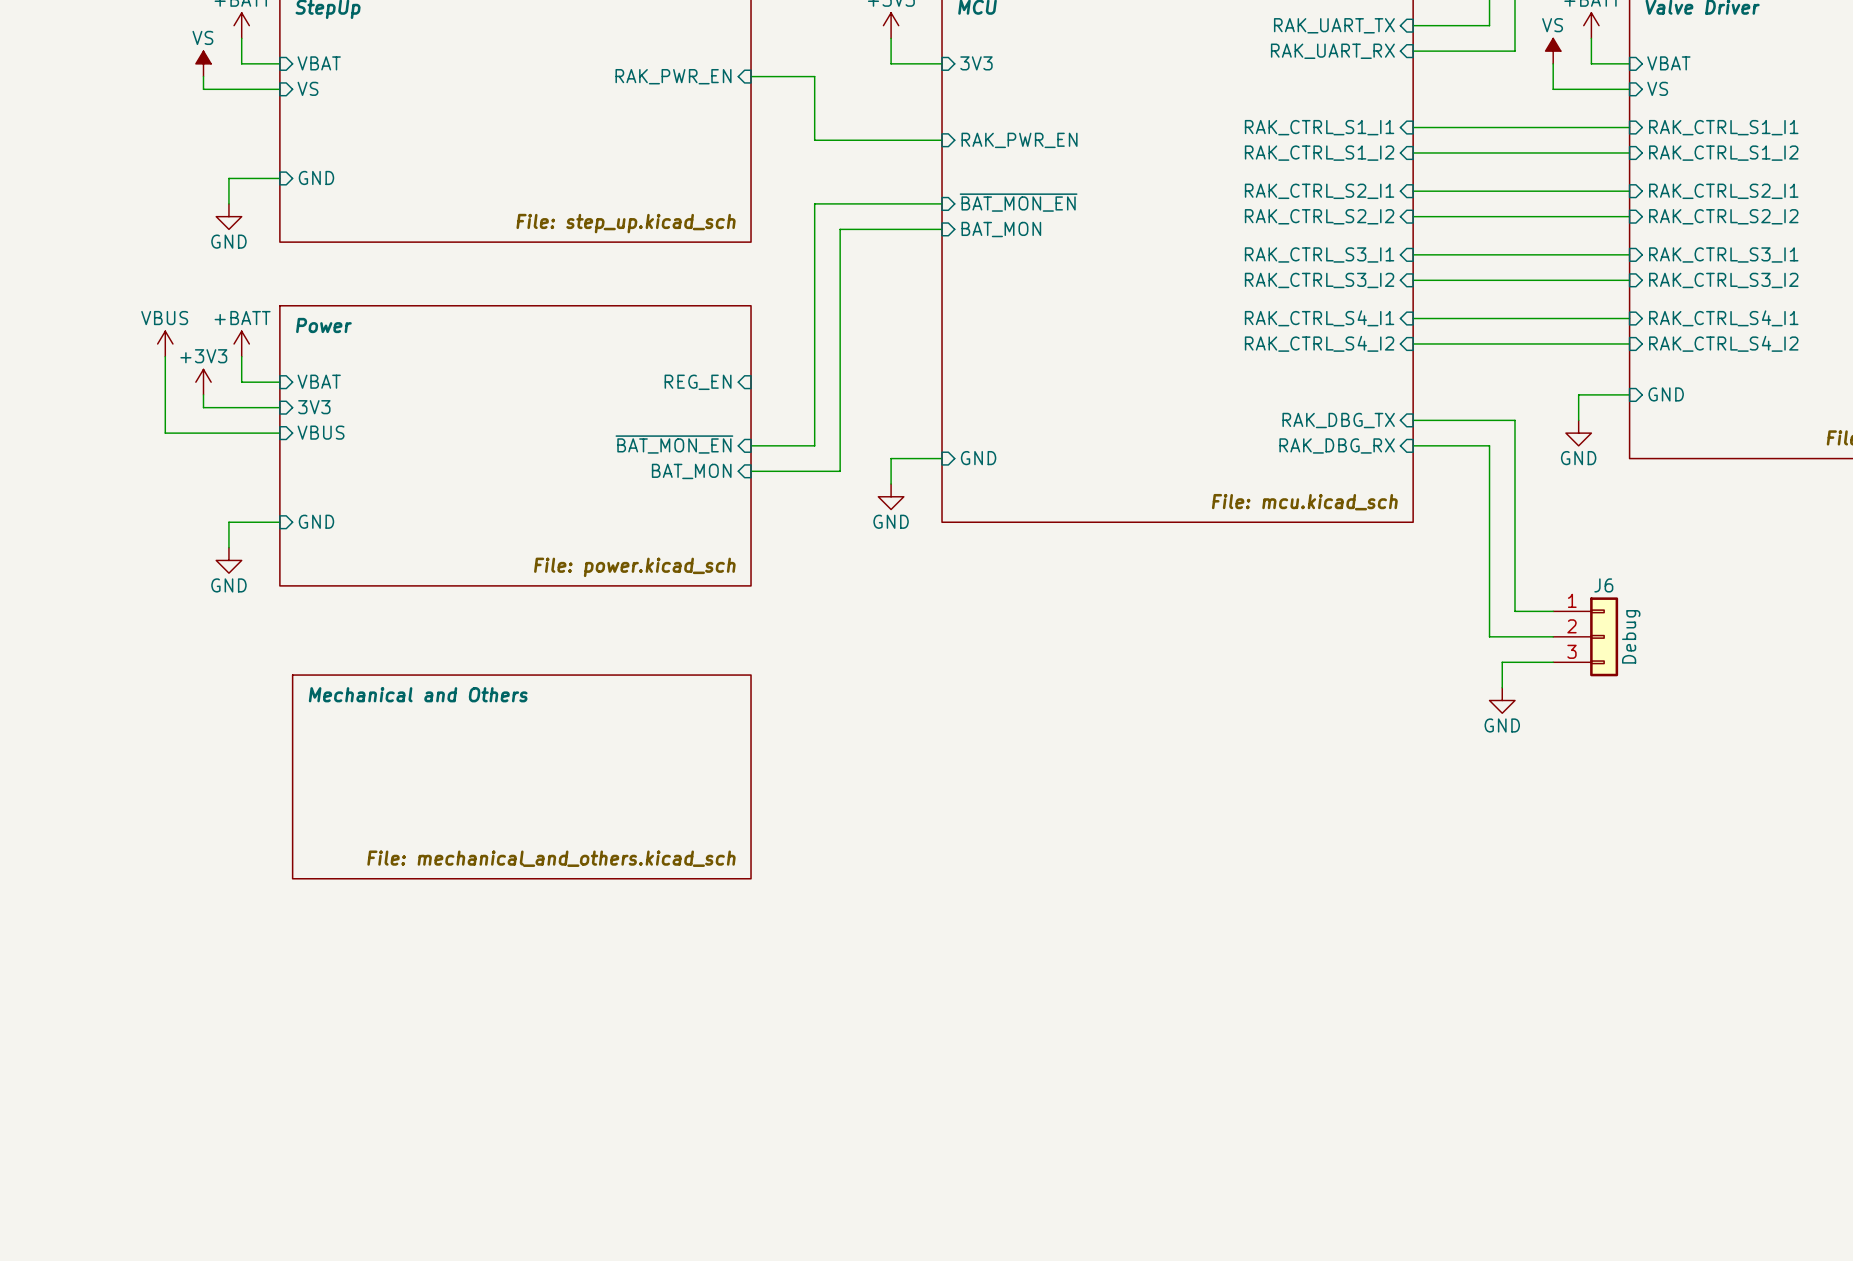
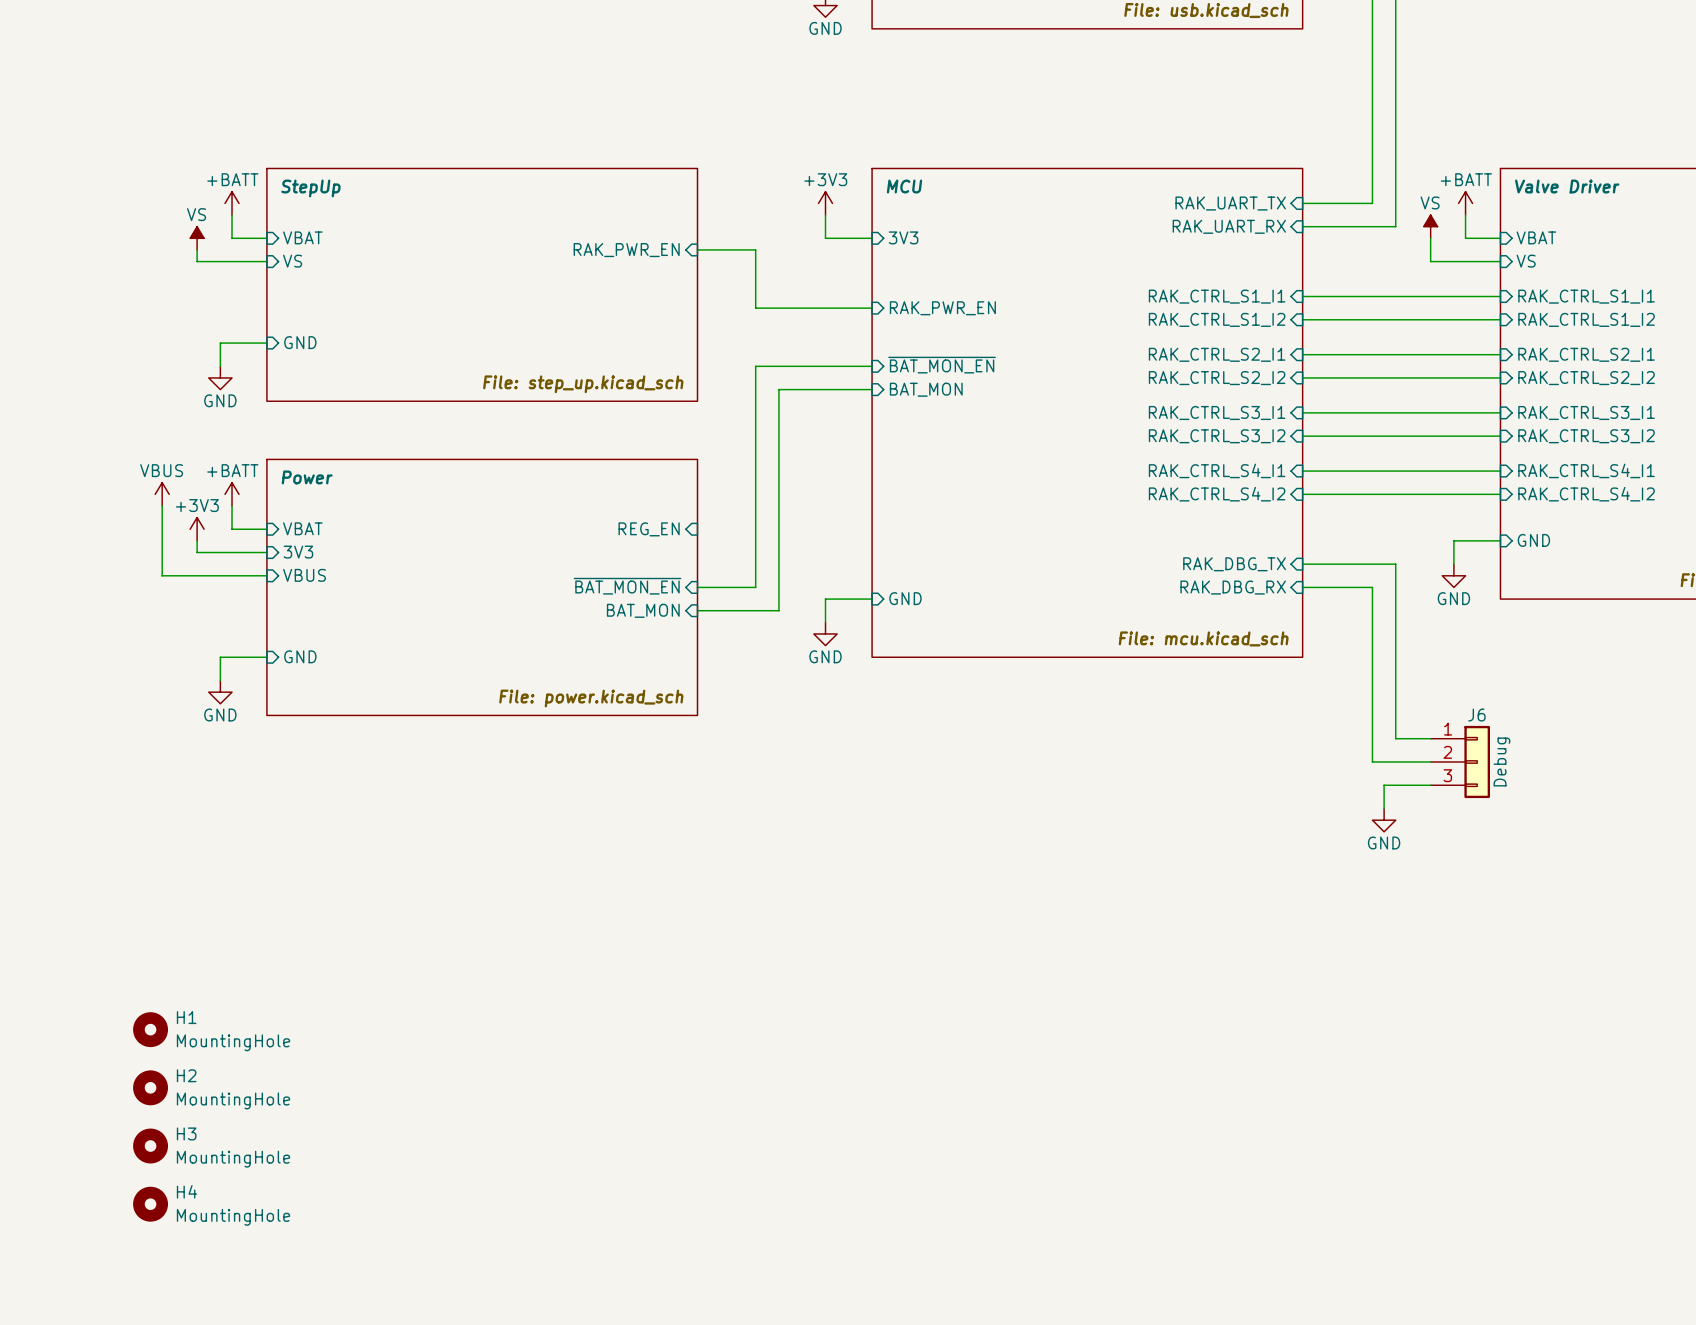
sheet Mechanical and Others: File: mechanical_and_others.kicad_sch (521, 776) -> none
H1: none -> MountingHole (150, 1029)
H2: none -> MountingHole (150, 1087)
H3: none -> MountingHole (150, 1146)
H4: none -> MountingHole (150, 1204)

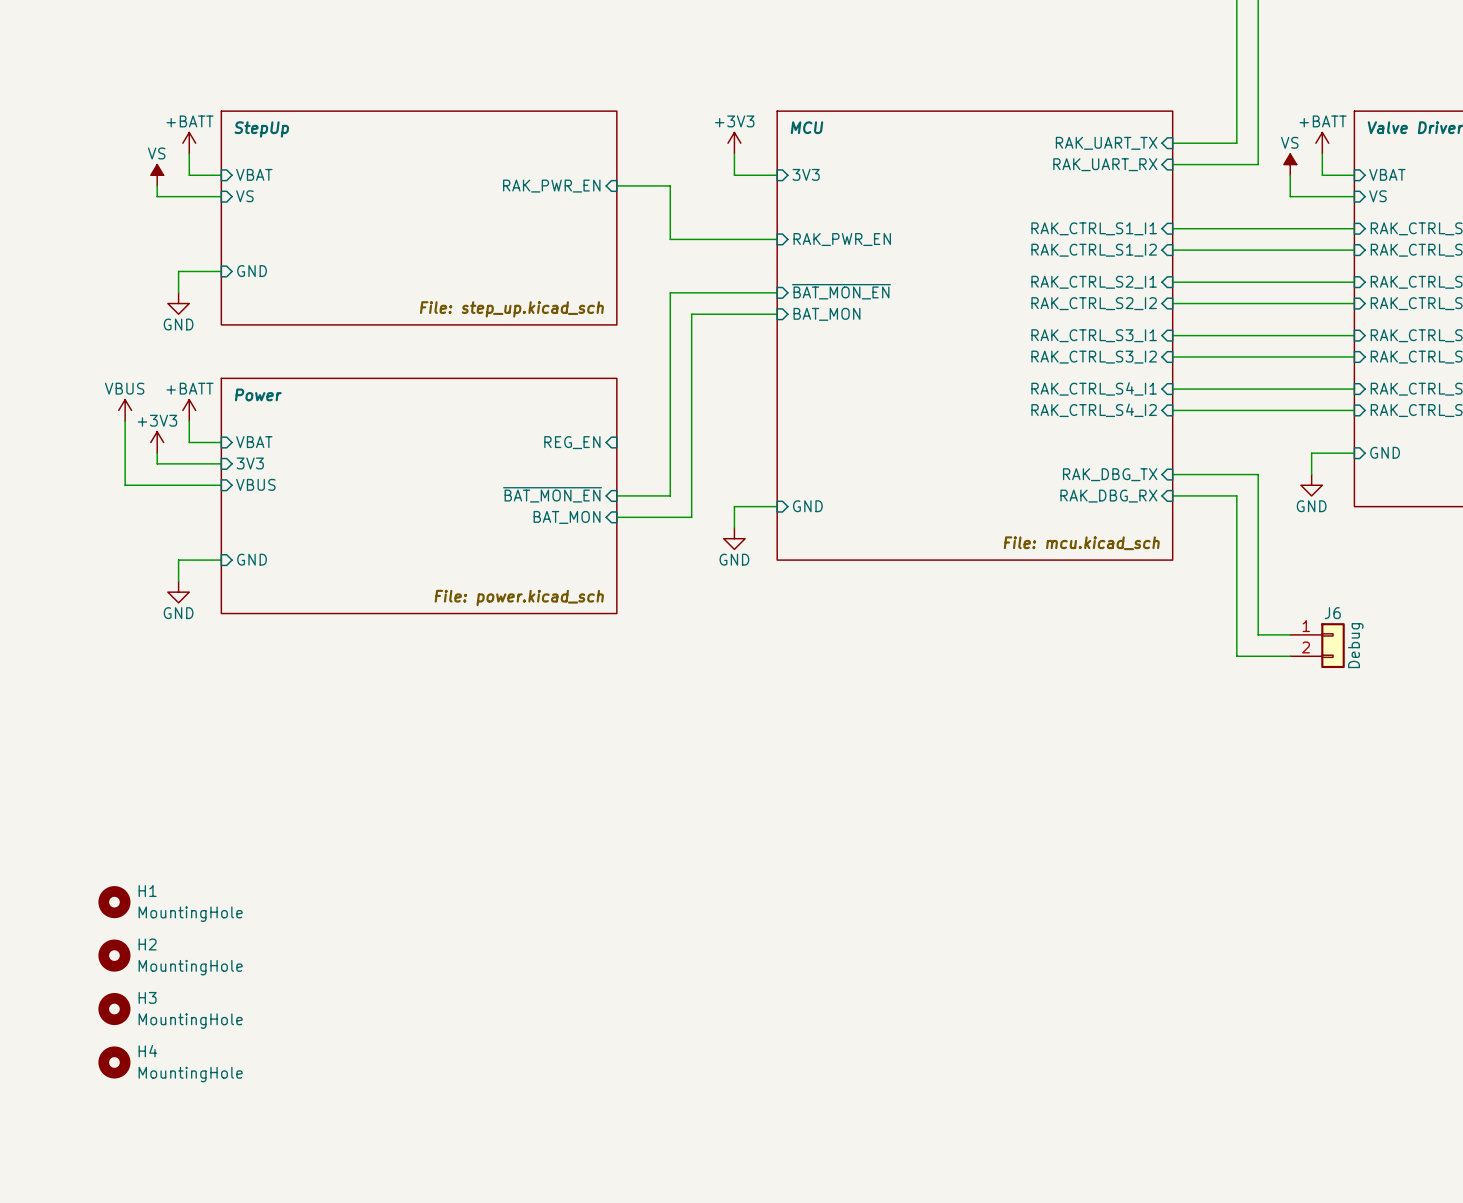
J6 symbol: [1430, 725, 1490, 799] -> [1290, 623, 1345, 669]
wire: (1430, 785) (1384, 785) (1384, 808) -> none
power symbol: GND (1384, 820) -> none

